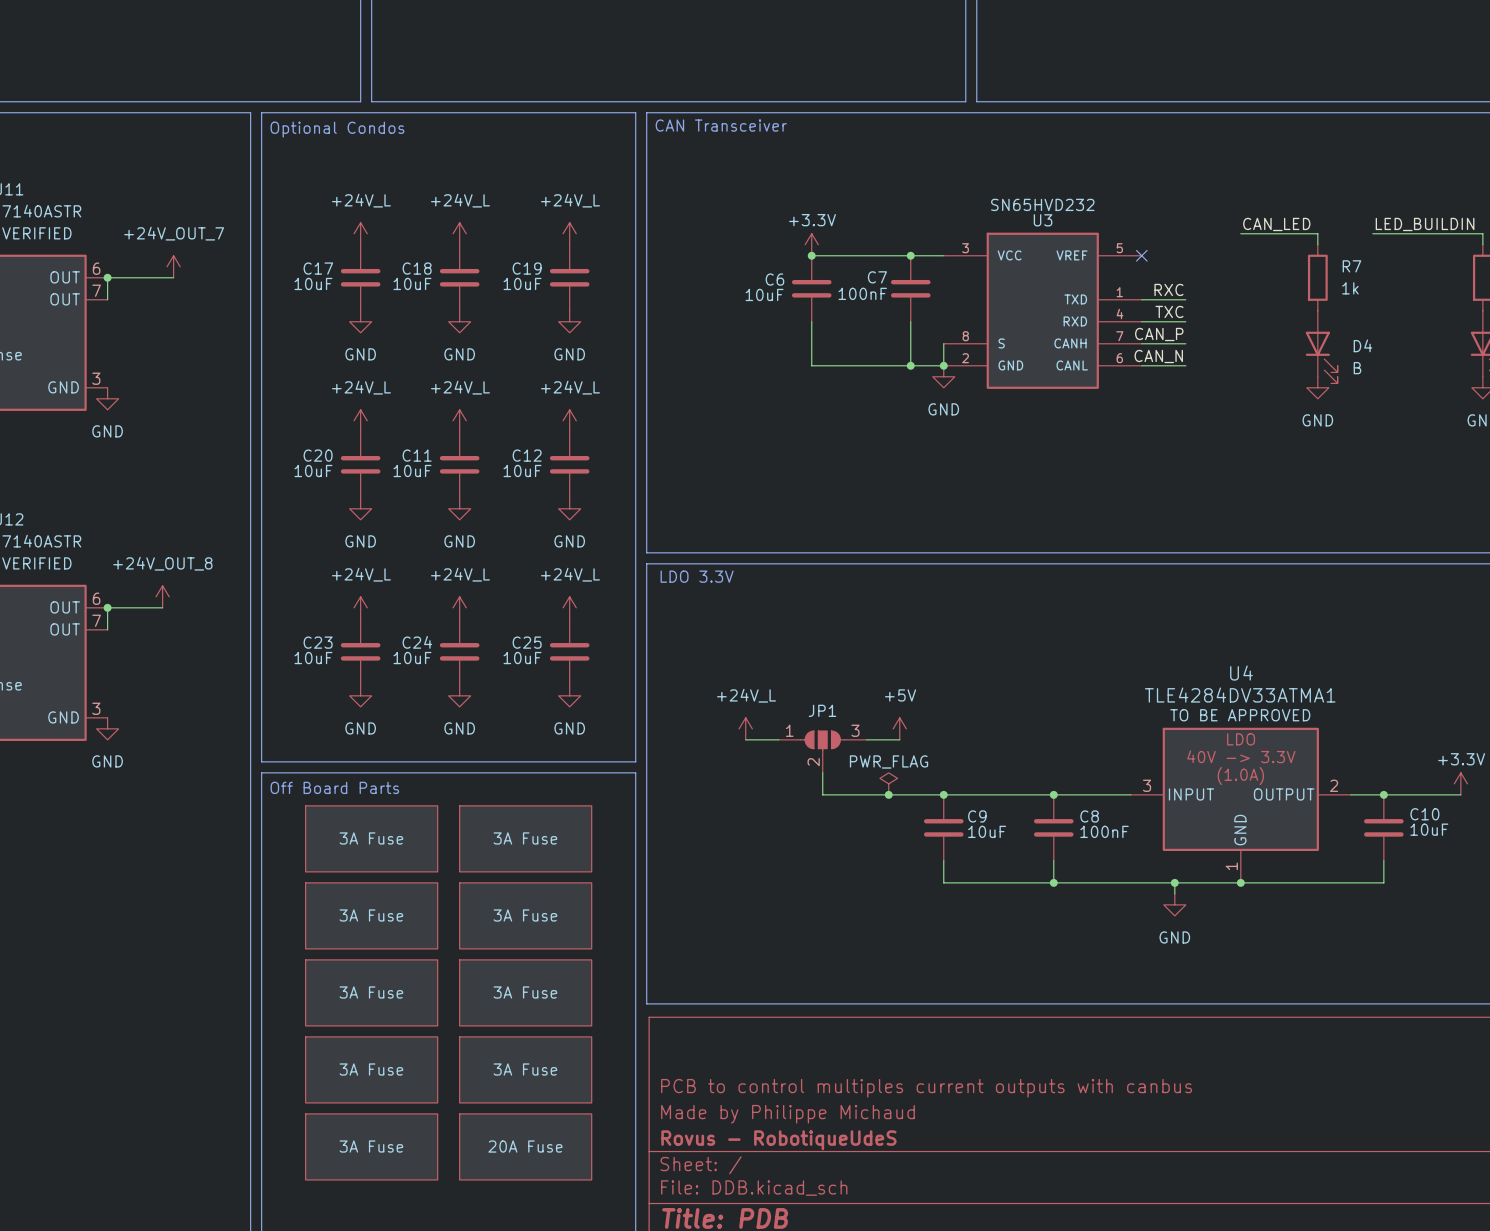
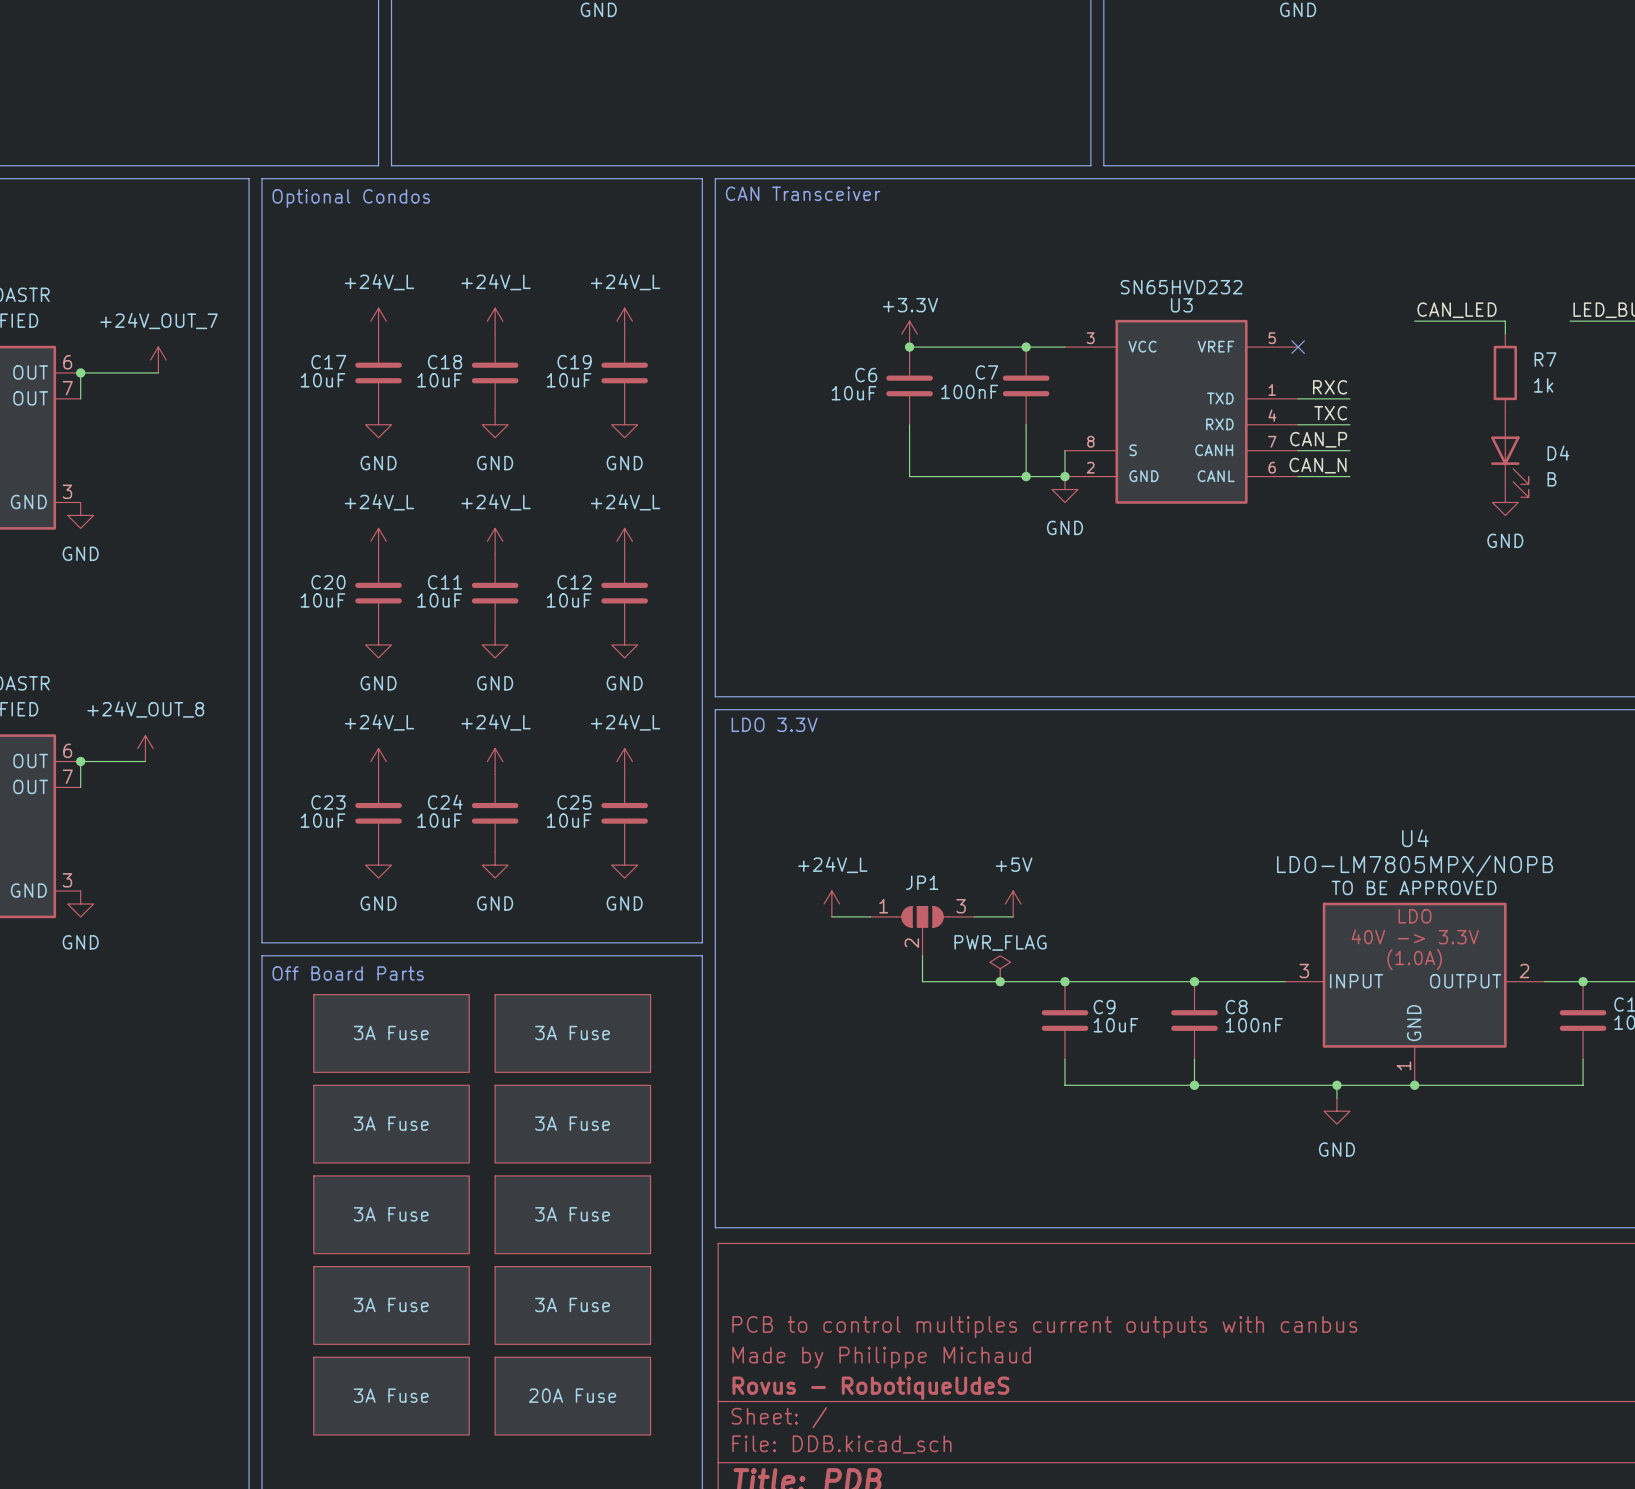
U4 value: TLE4284DV33ATMA1 (1240, 695) -> LDO-LM7805MPX/NOPB (1415, 866)

